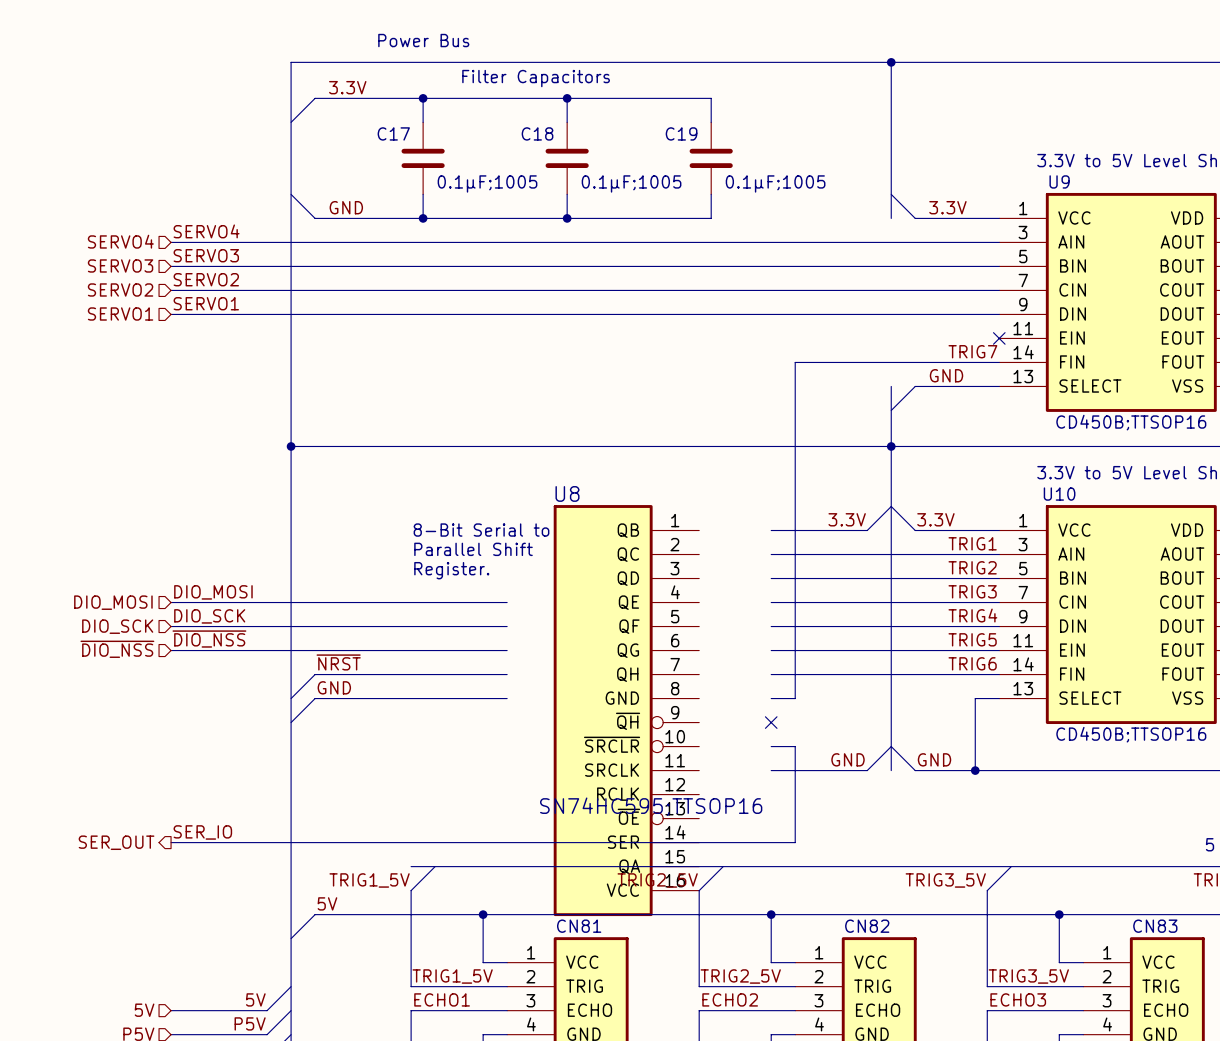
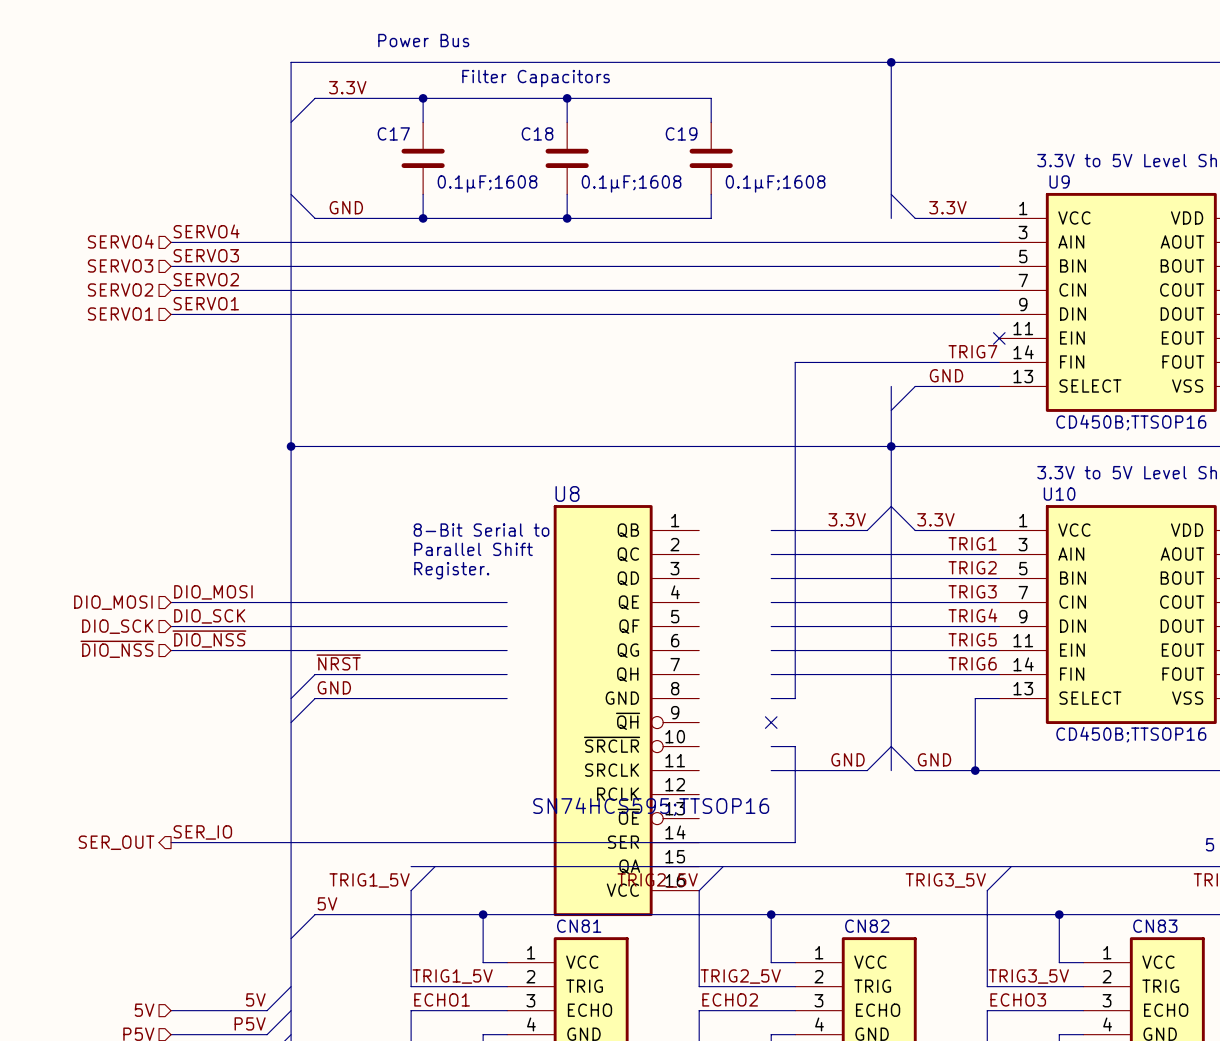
C17 value: 0.1µF;1005 (487, 183) -> 0.1µF;1608 (487, 183)
C18 value: 0.1µF;1005 (631, 183) -> 0.1µF;1608 (631, 183)
C19 value: 0.1µF;1005 (775, 183) -> 0.1µF;1608 (775, 183)
U8 value: SN74HC595;TTSOP16 (651, 806) -> SN74HCS595;TTSOP16 (651, 806)

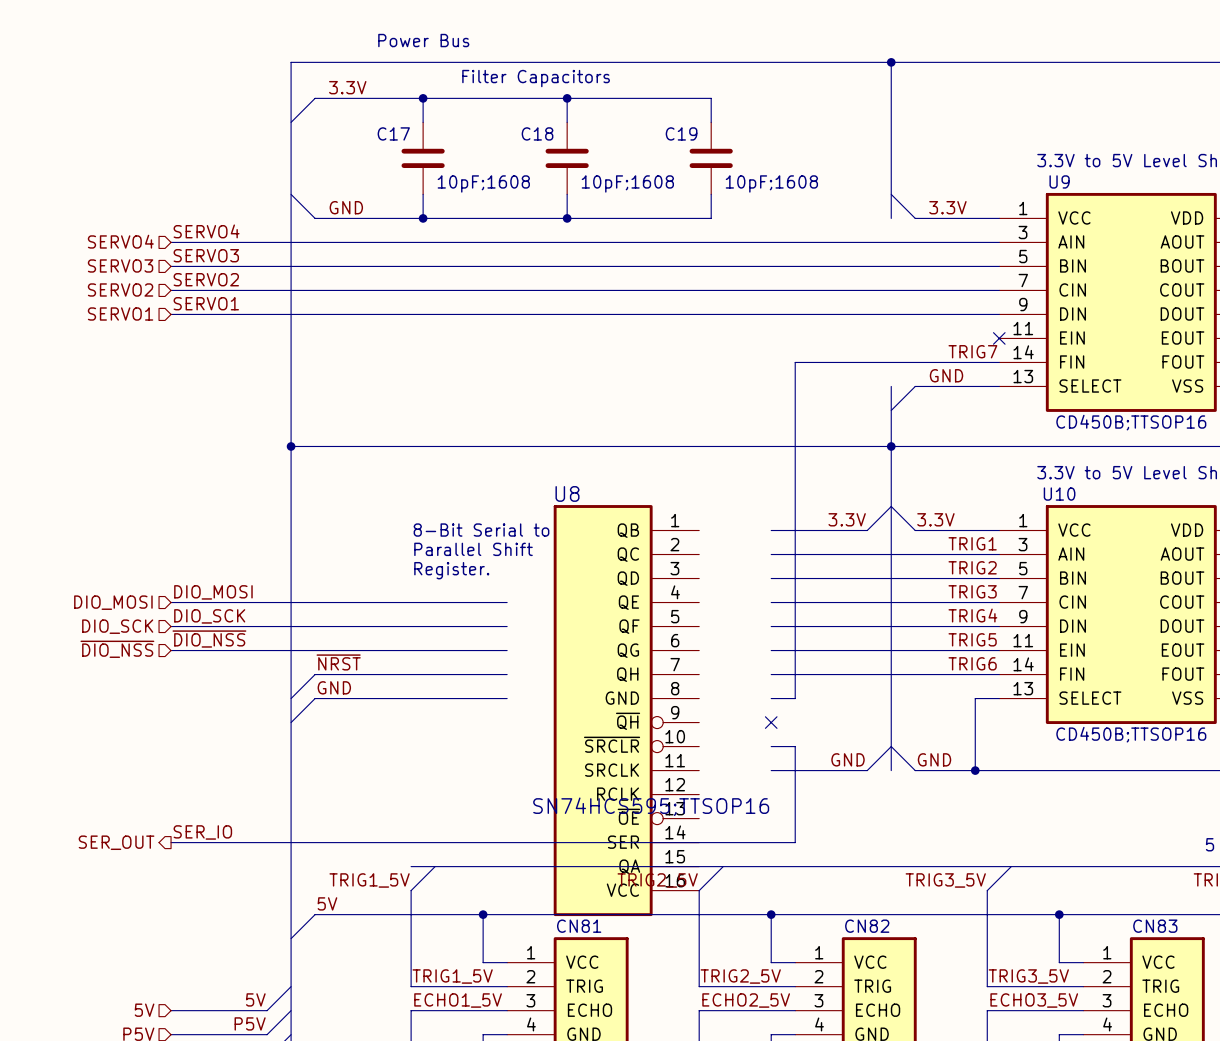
C17 value: 0.1µF;1608 (487, 183) -> 10pF;1608 (483, 183)
C18 value: 0.1µF;1608 (631, 183) -> 10pF;1608 (627, 183)
C19 value: 0.1µF;1608 (775, 183) -> 10pF;1608 (771, 183)
label: ECHO1 (442, 999) -> ECHO1_5V (458, 1000)
label: ECHO2 (730, 999) -> ECHO2_5V (746, 1000)
label: ECHO3 (1018, 999) -> ECHO3_5V (1034, 1000)

